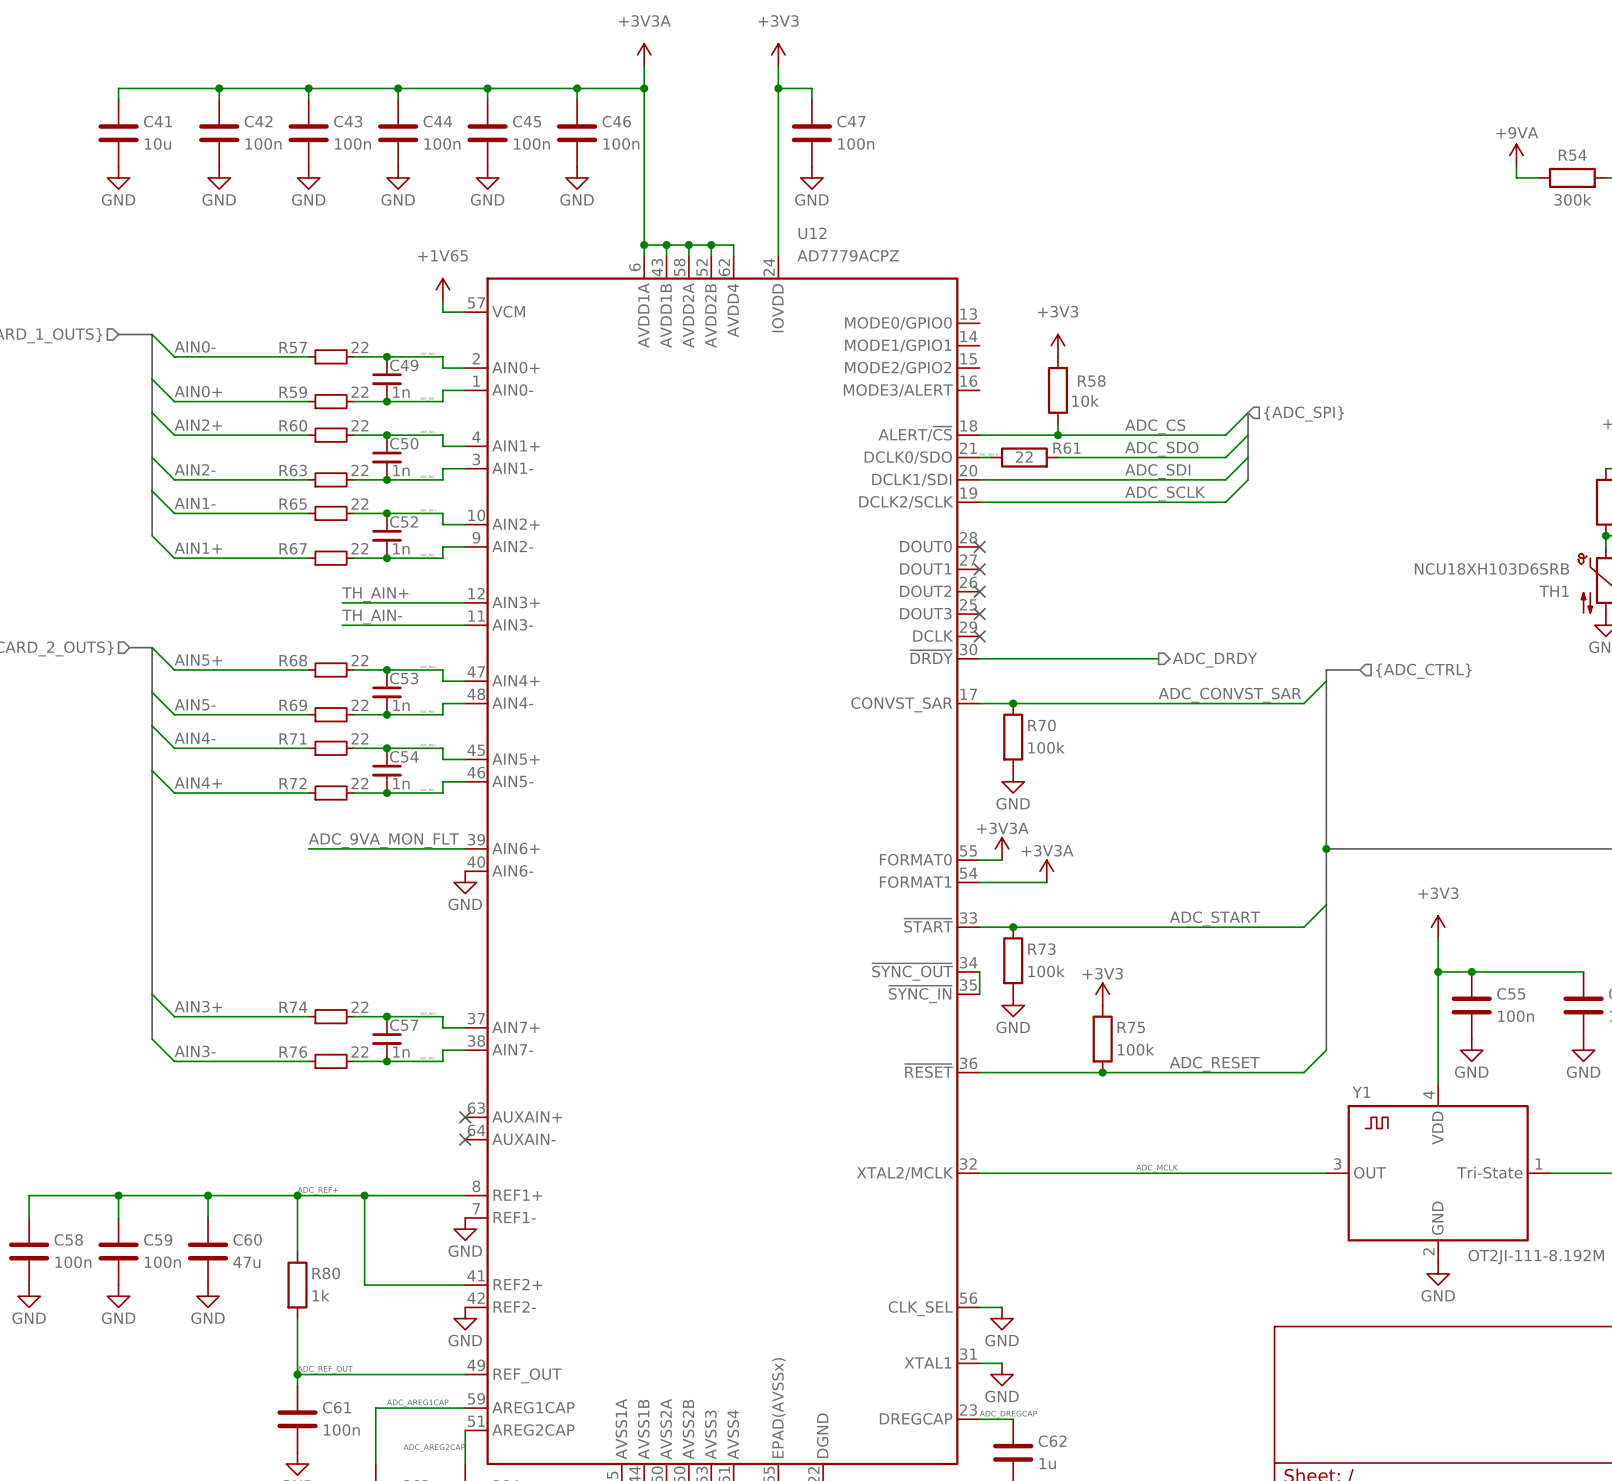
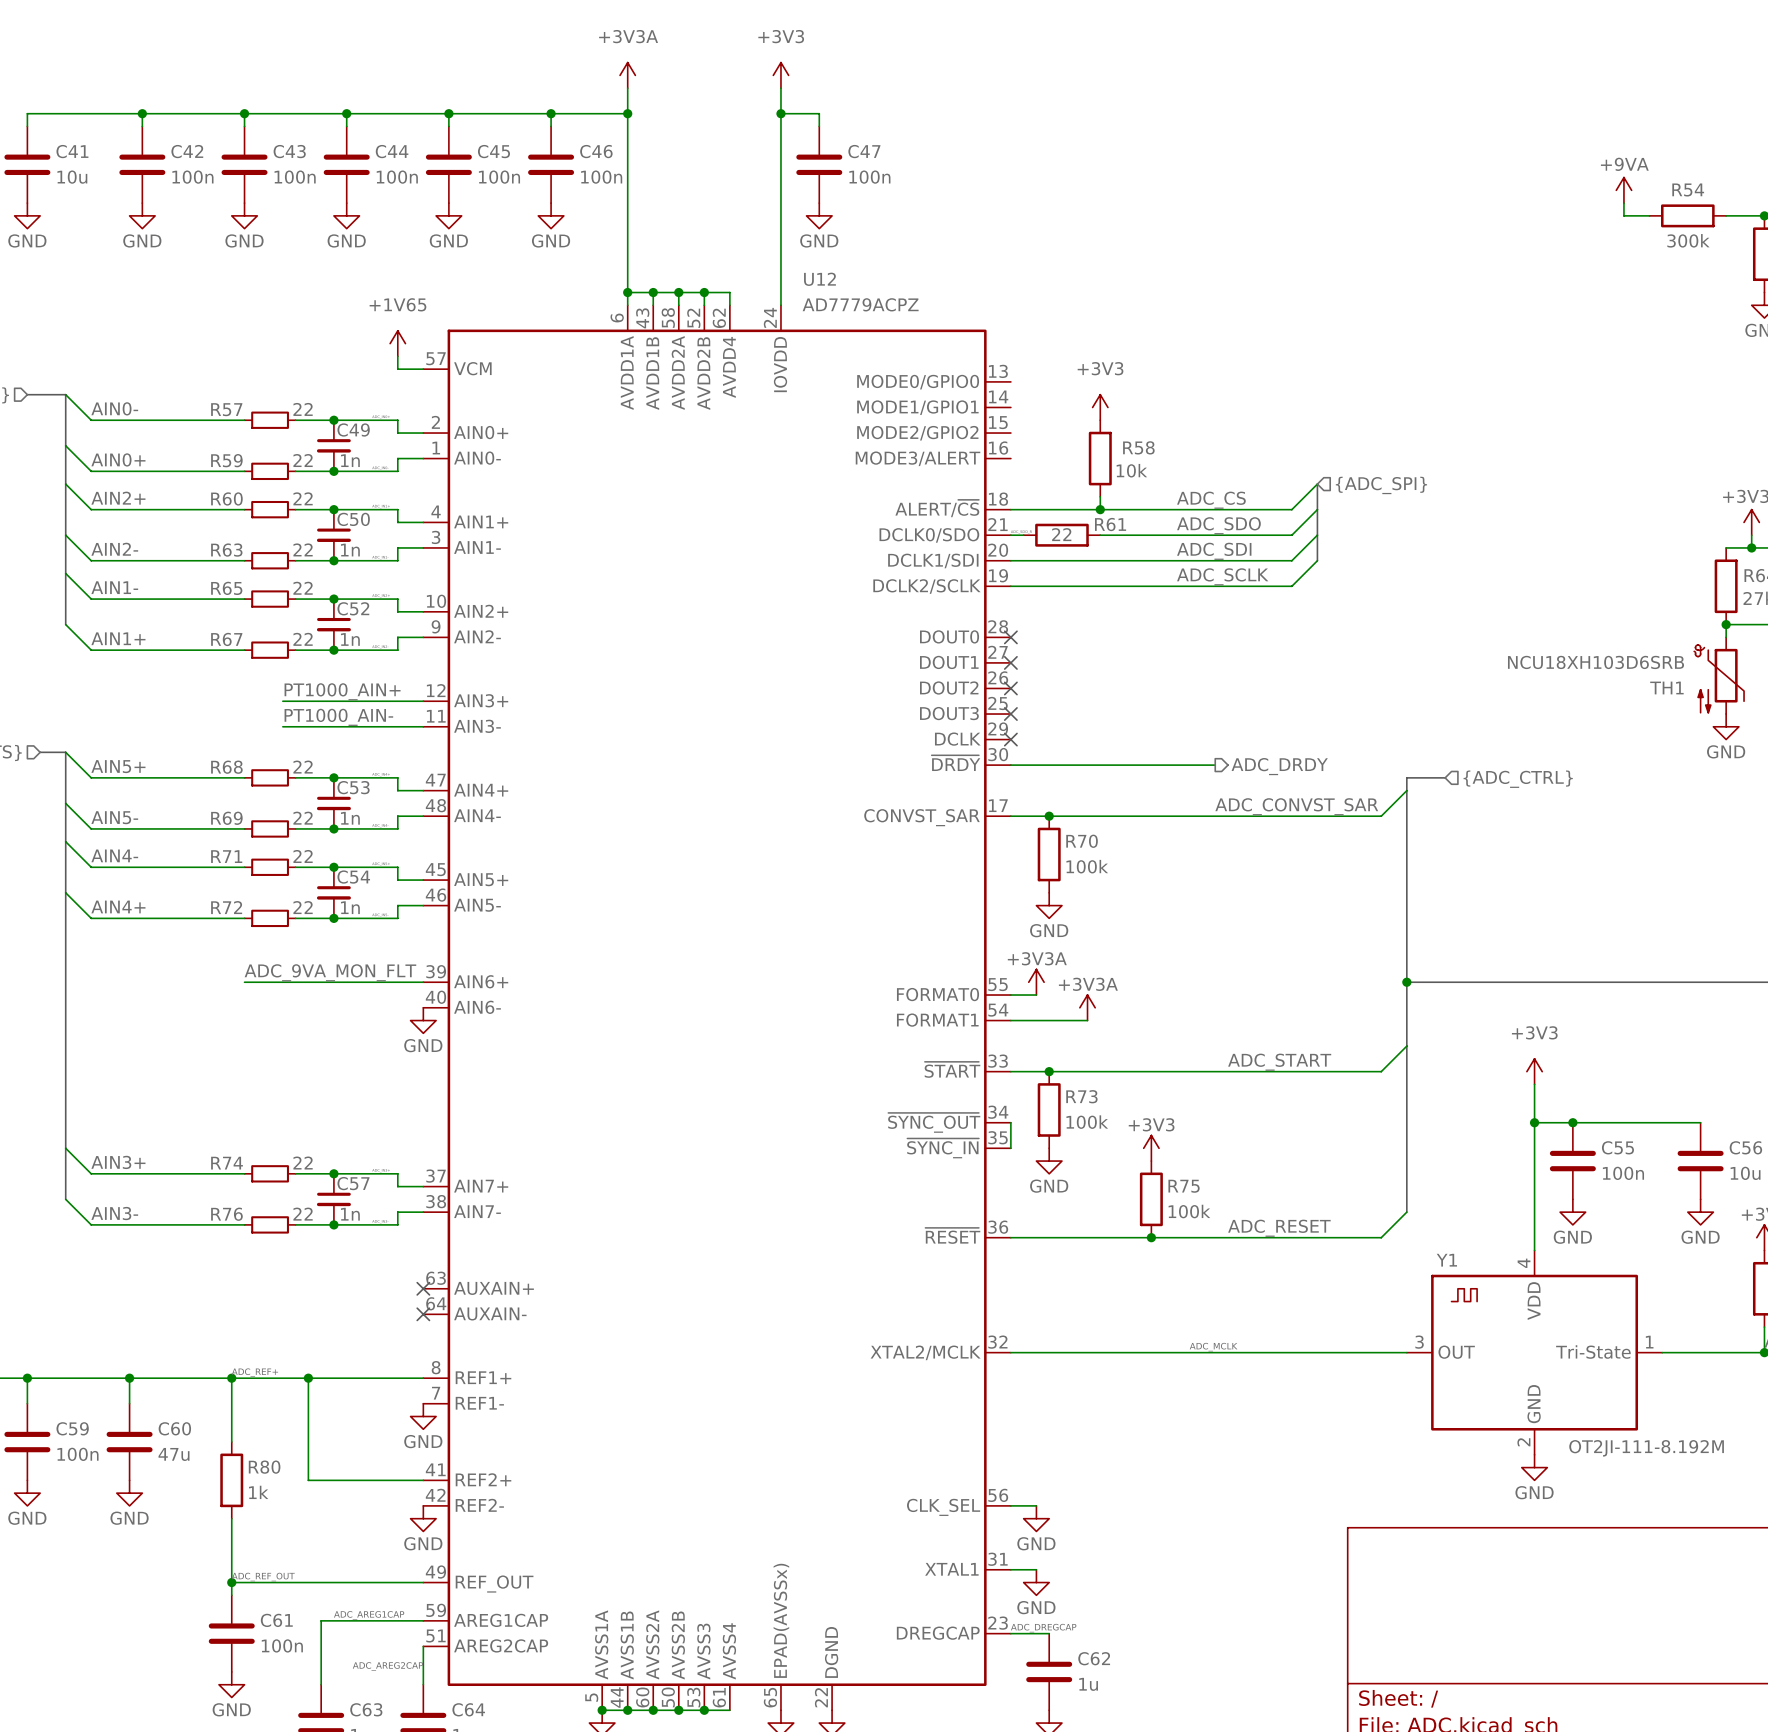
label: TH_AIN+ (375, 594) -> PT1000_AIN+ (342, 691)
label: TH_AIN- (372, 617) -> PT1000_AIN- (338, 717)

